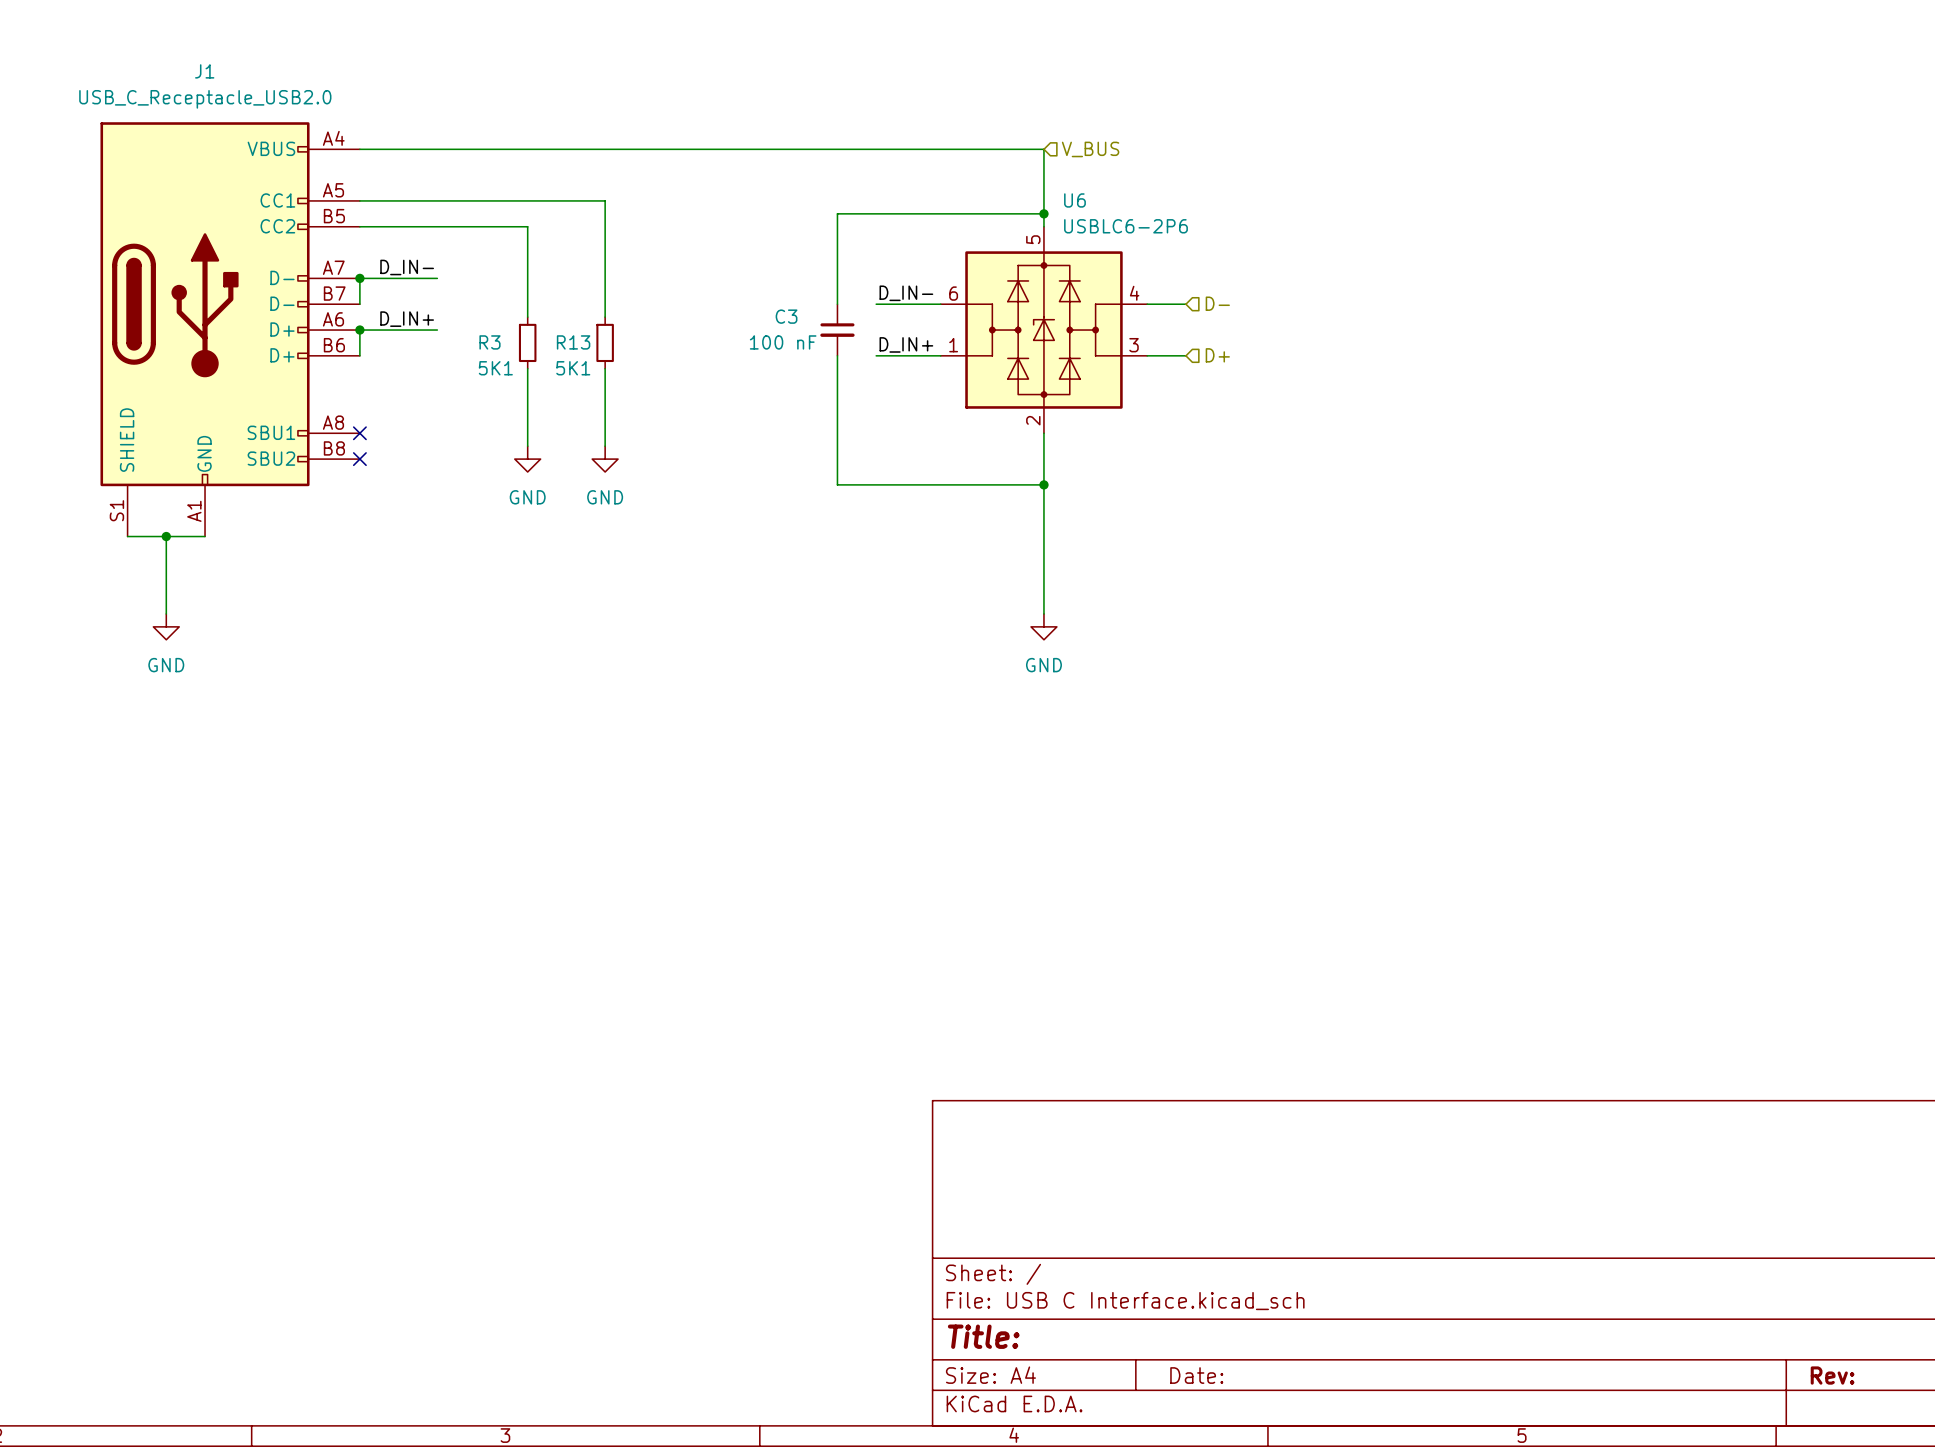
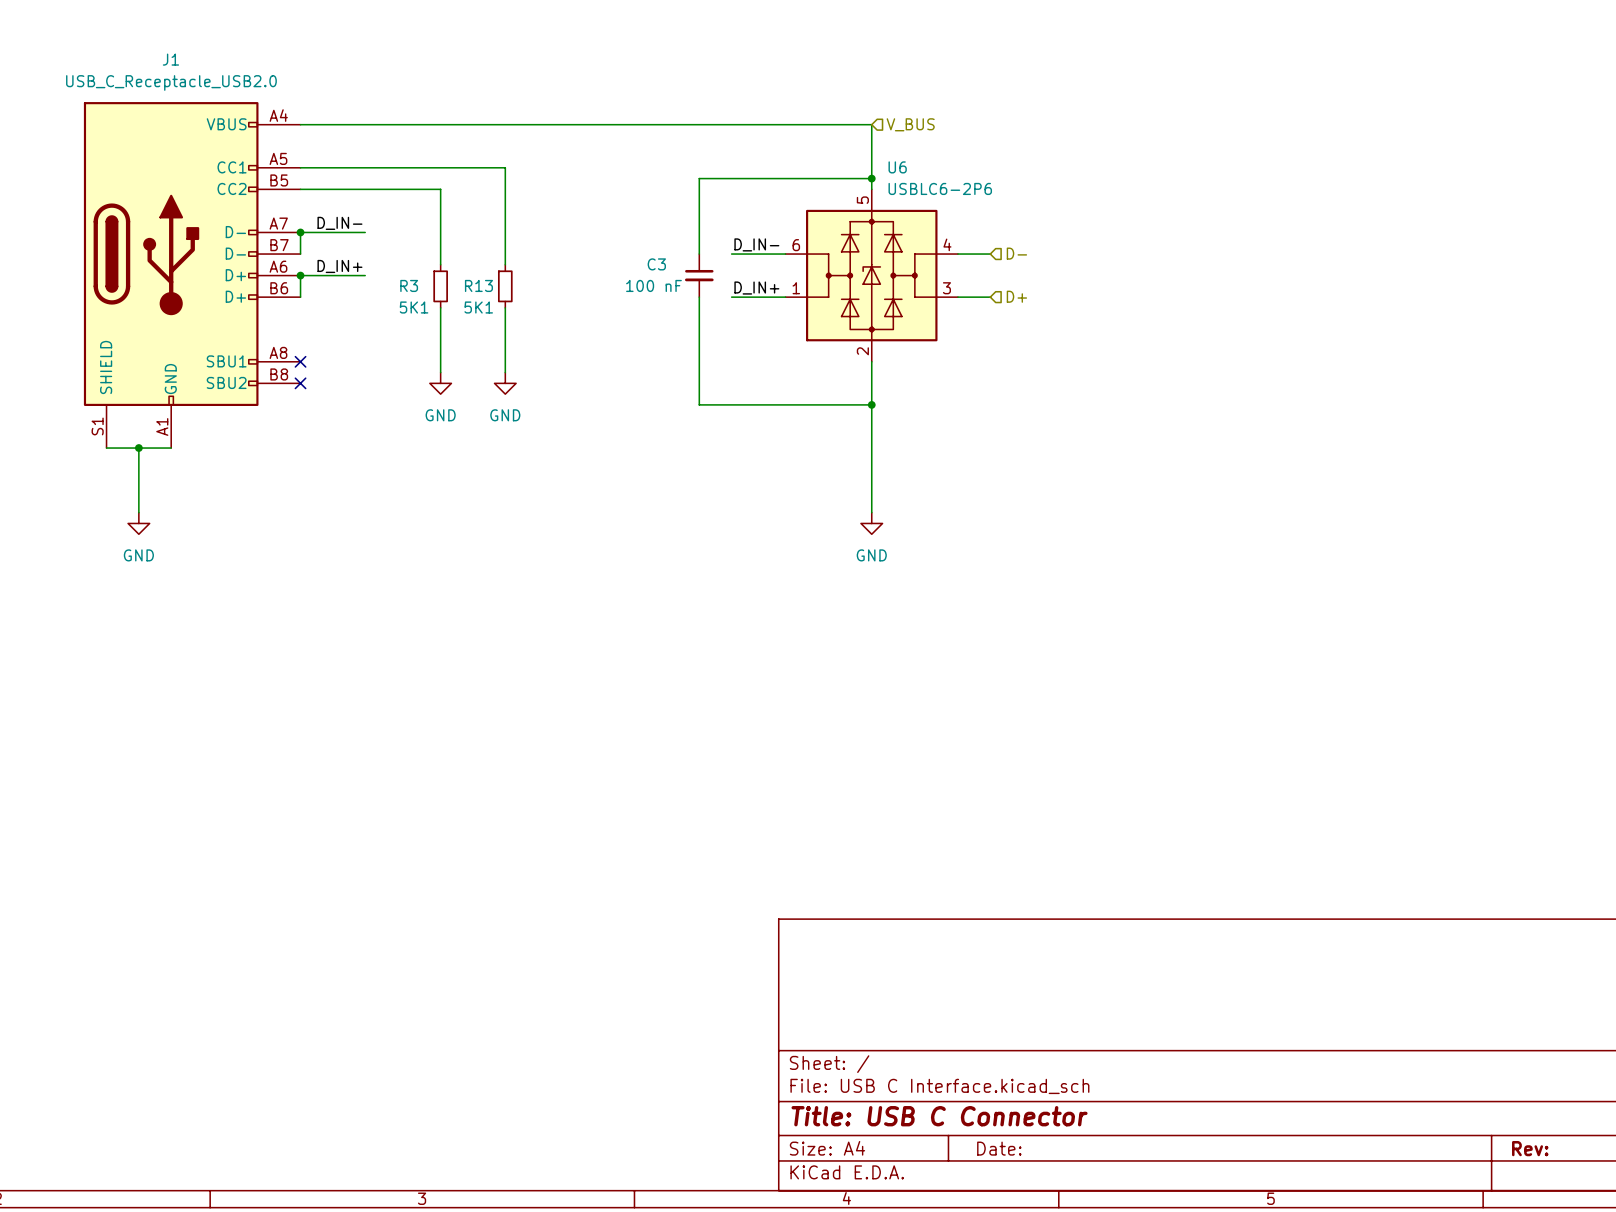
title block: Title: (983, 1336) -> Title: USB C Connector (939, 1116)

